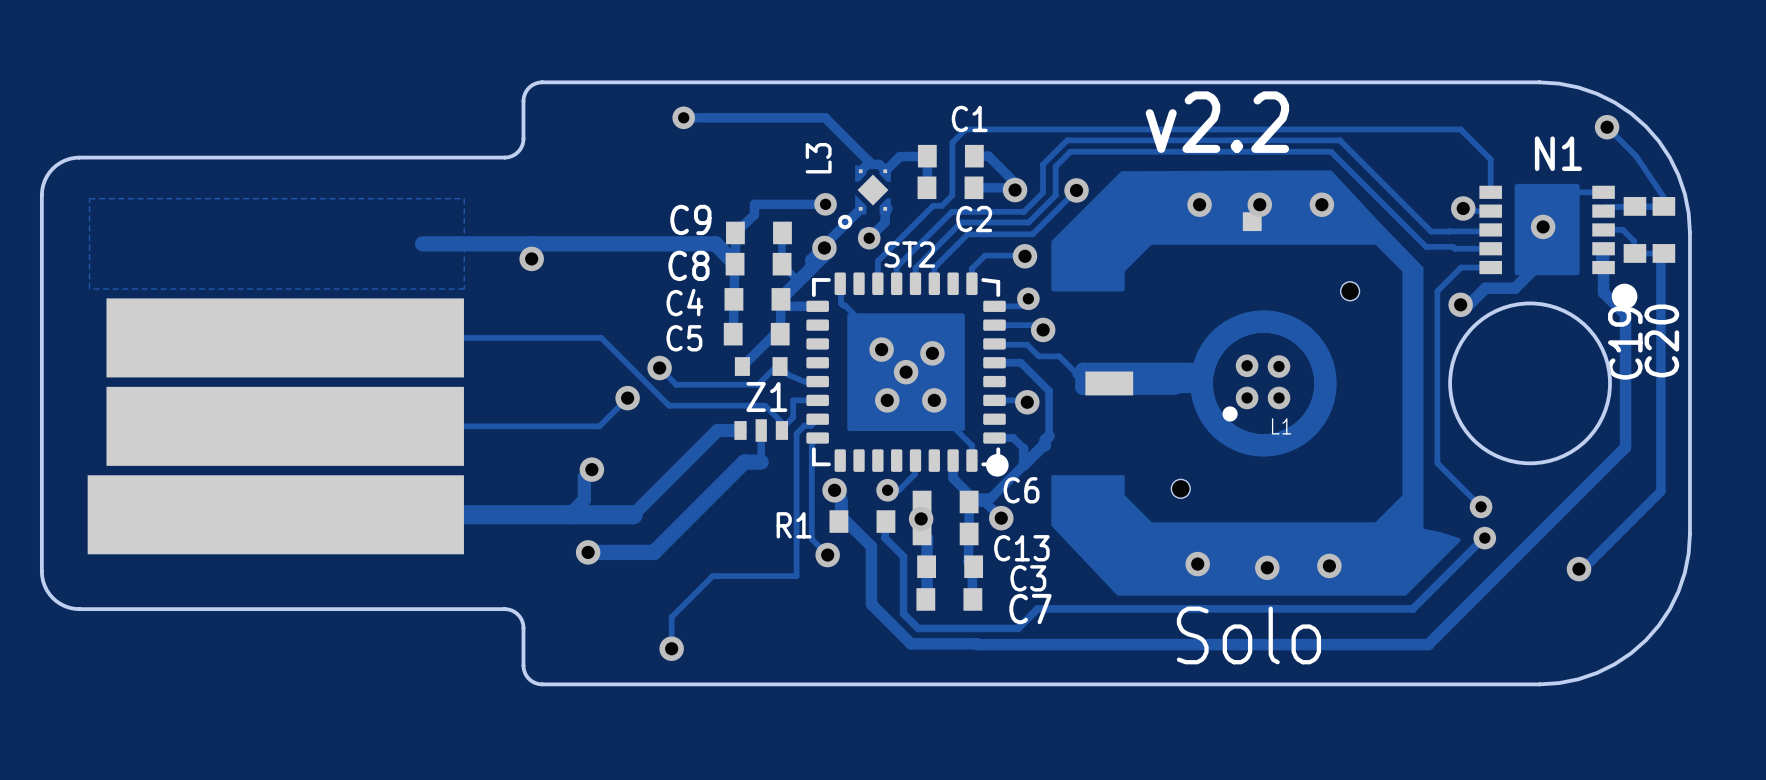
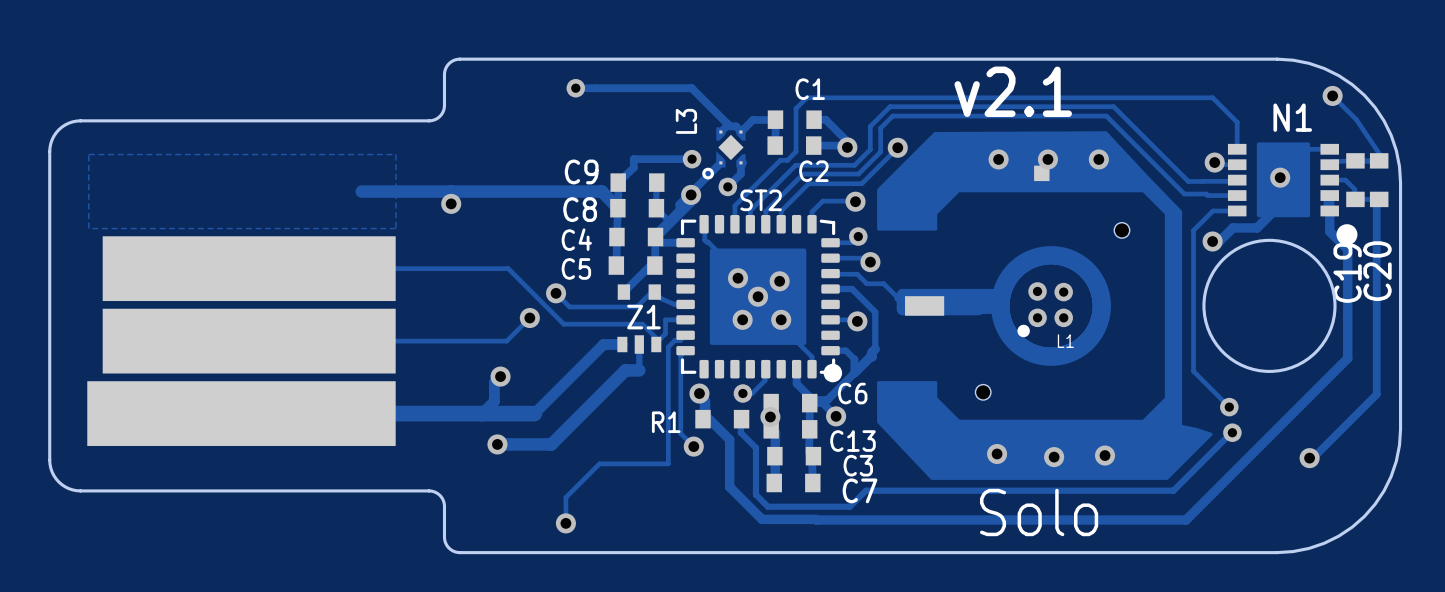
text: v2.2 (1217, 122) -> v2.1 (1013, 91)

